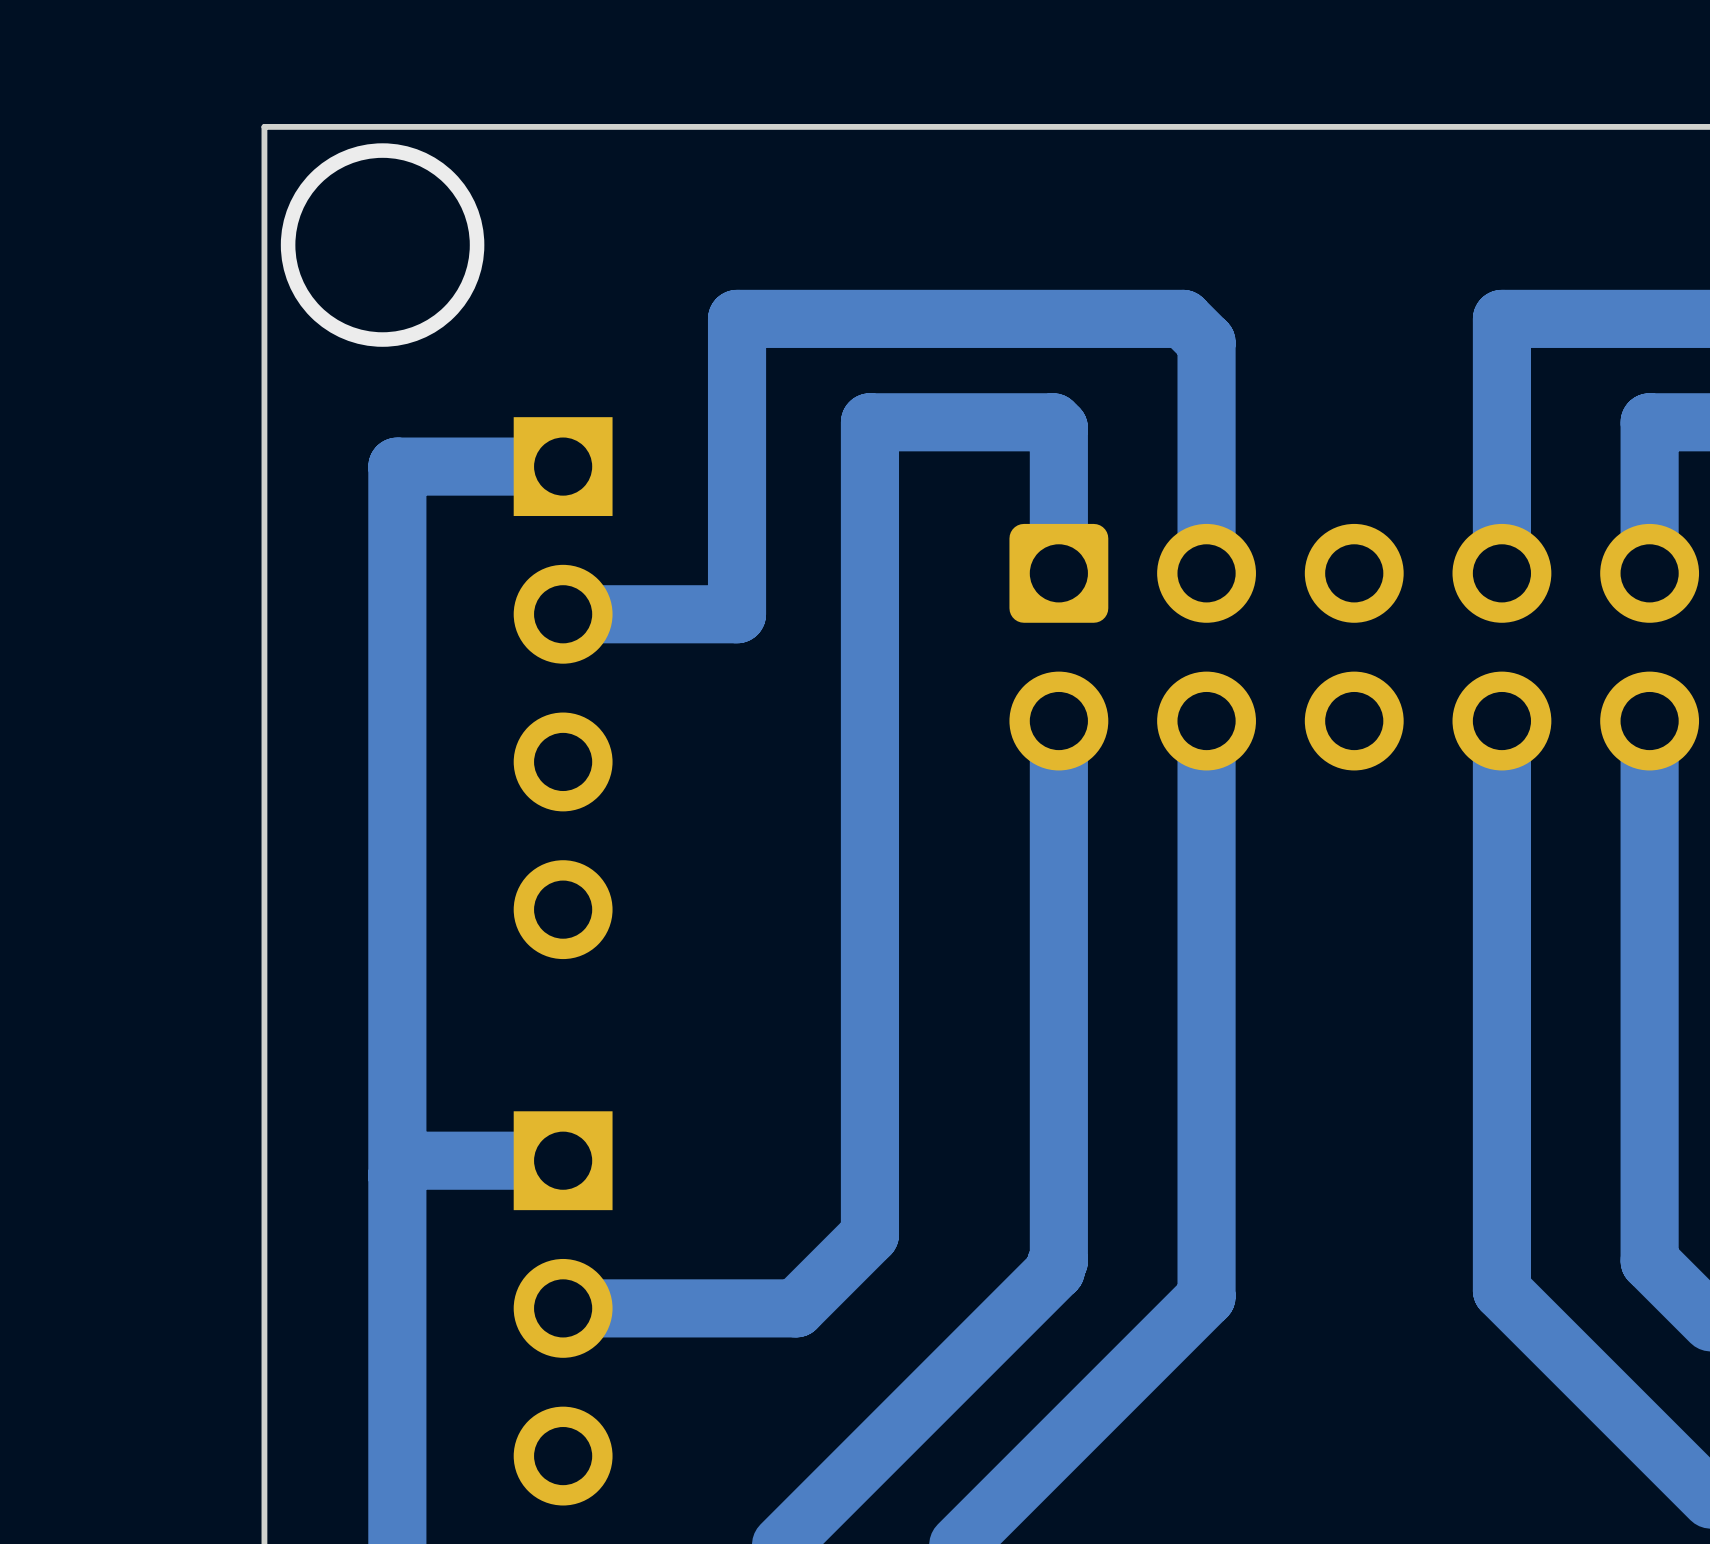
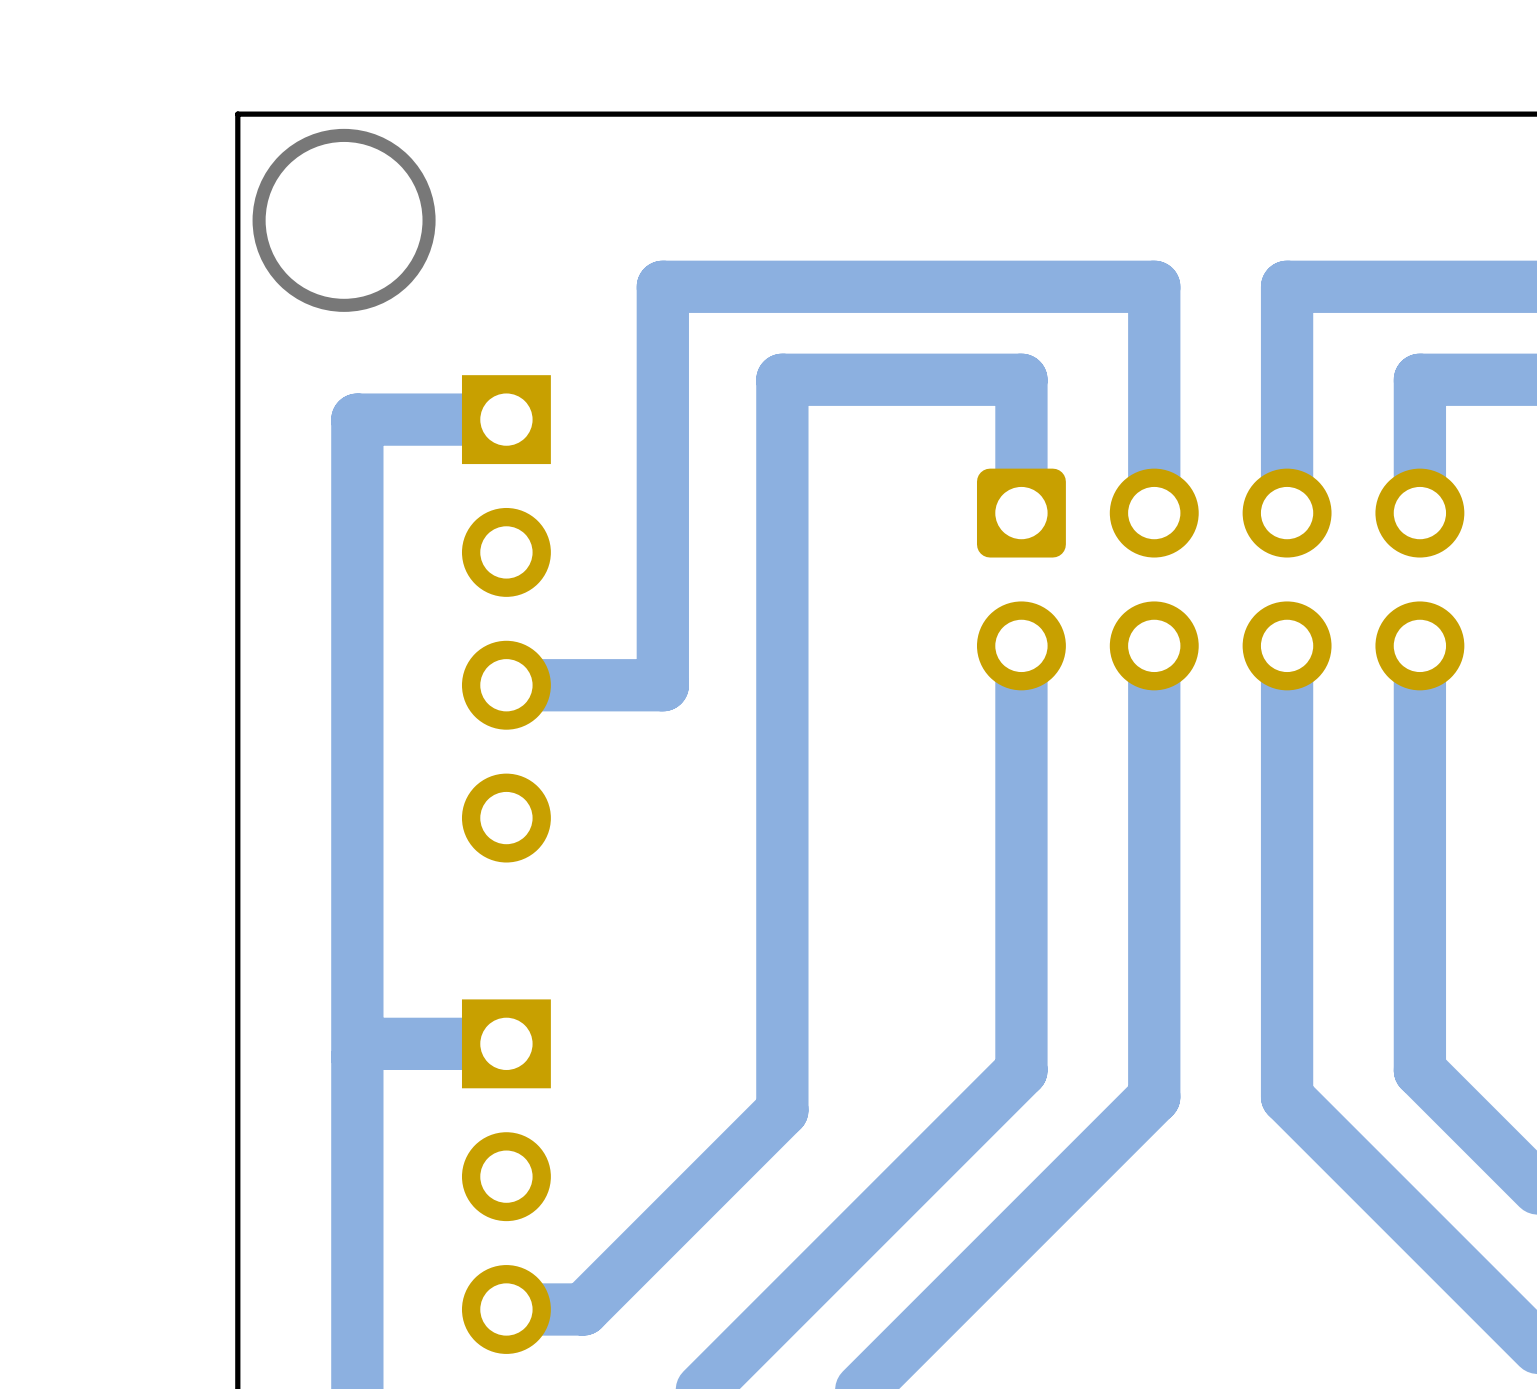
track: (1183, 318) (1206, 342) (1206, 573) -> (1063, 286) (1154, 286) (1154, 513)
track: (1501, 318) (1501, 573) -> (1350, 286) (1287, 286) (1287, 513)
track: (1053, 422) (1058, 428) (1058, 573) -> (947, 379) (1021, 379) (1021, 513)
track: (1649, 422) (1649, 573) -> (1483, 379) (1419, 379) (1419, 513)
part footprint: [1009, 523, 1700, 771] -> [976, 468, 1465, 691]
track: (737, 614) (563, 614) -> (662, 552) (662, 685) (506, 685)
track: (1058, 721) (1058, 1261) (1055, 1263) (1055, 1270) -> (1021, 645) (1021, 1070) (949, 1142)
track: (1206, 721) (1206, 1296) -> (1154, 645) (1154, 1096) (1085, 1166)
track: (1501, 721) (1501, 1290) -> (1287, 645) (1287, 1096) (1350, 1160)
track: (1649, 721) (1649, 1261) -> (1419, 645) (1419, 1070) (1483, 1134)
track: (796, 1308) (563, 1308) -> (715, 1176) (583, 1309) (506, 1309)

